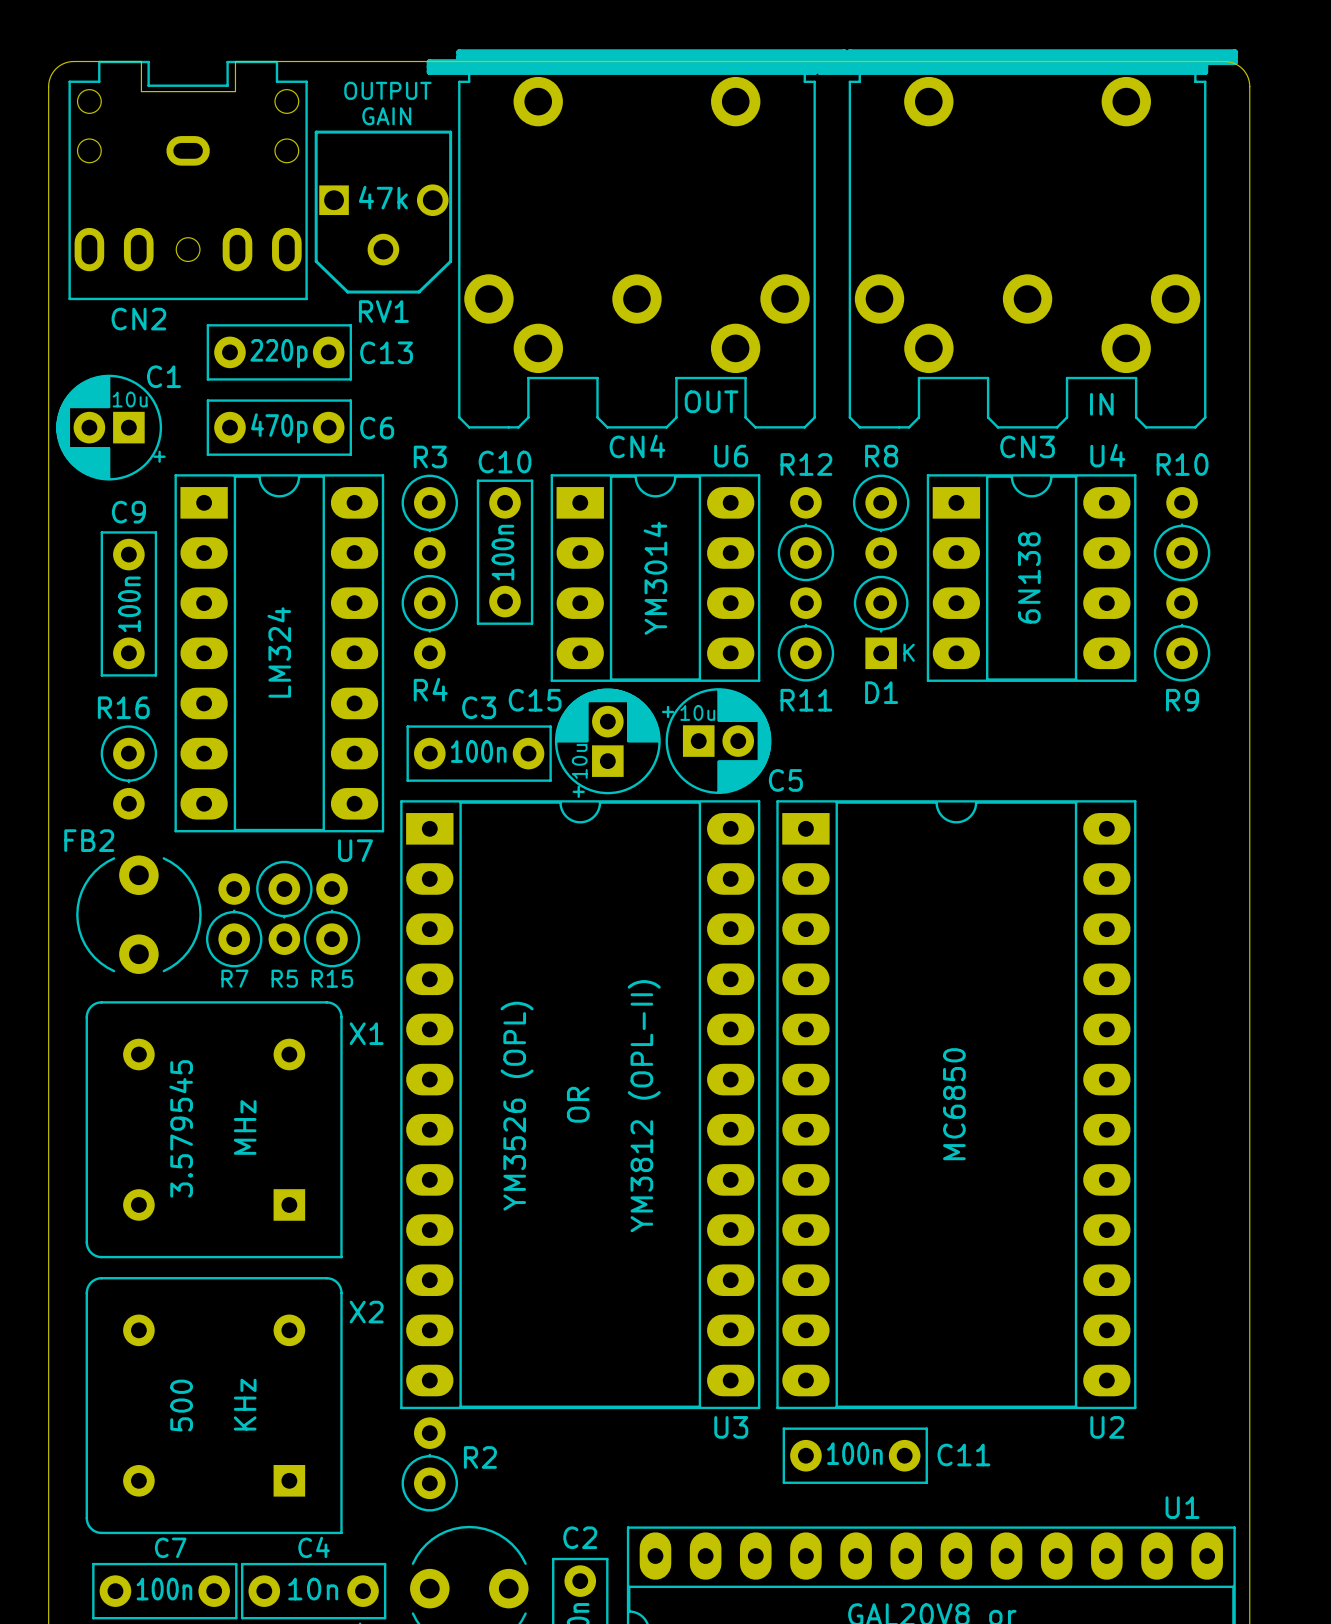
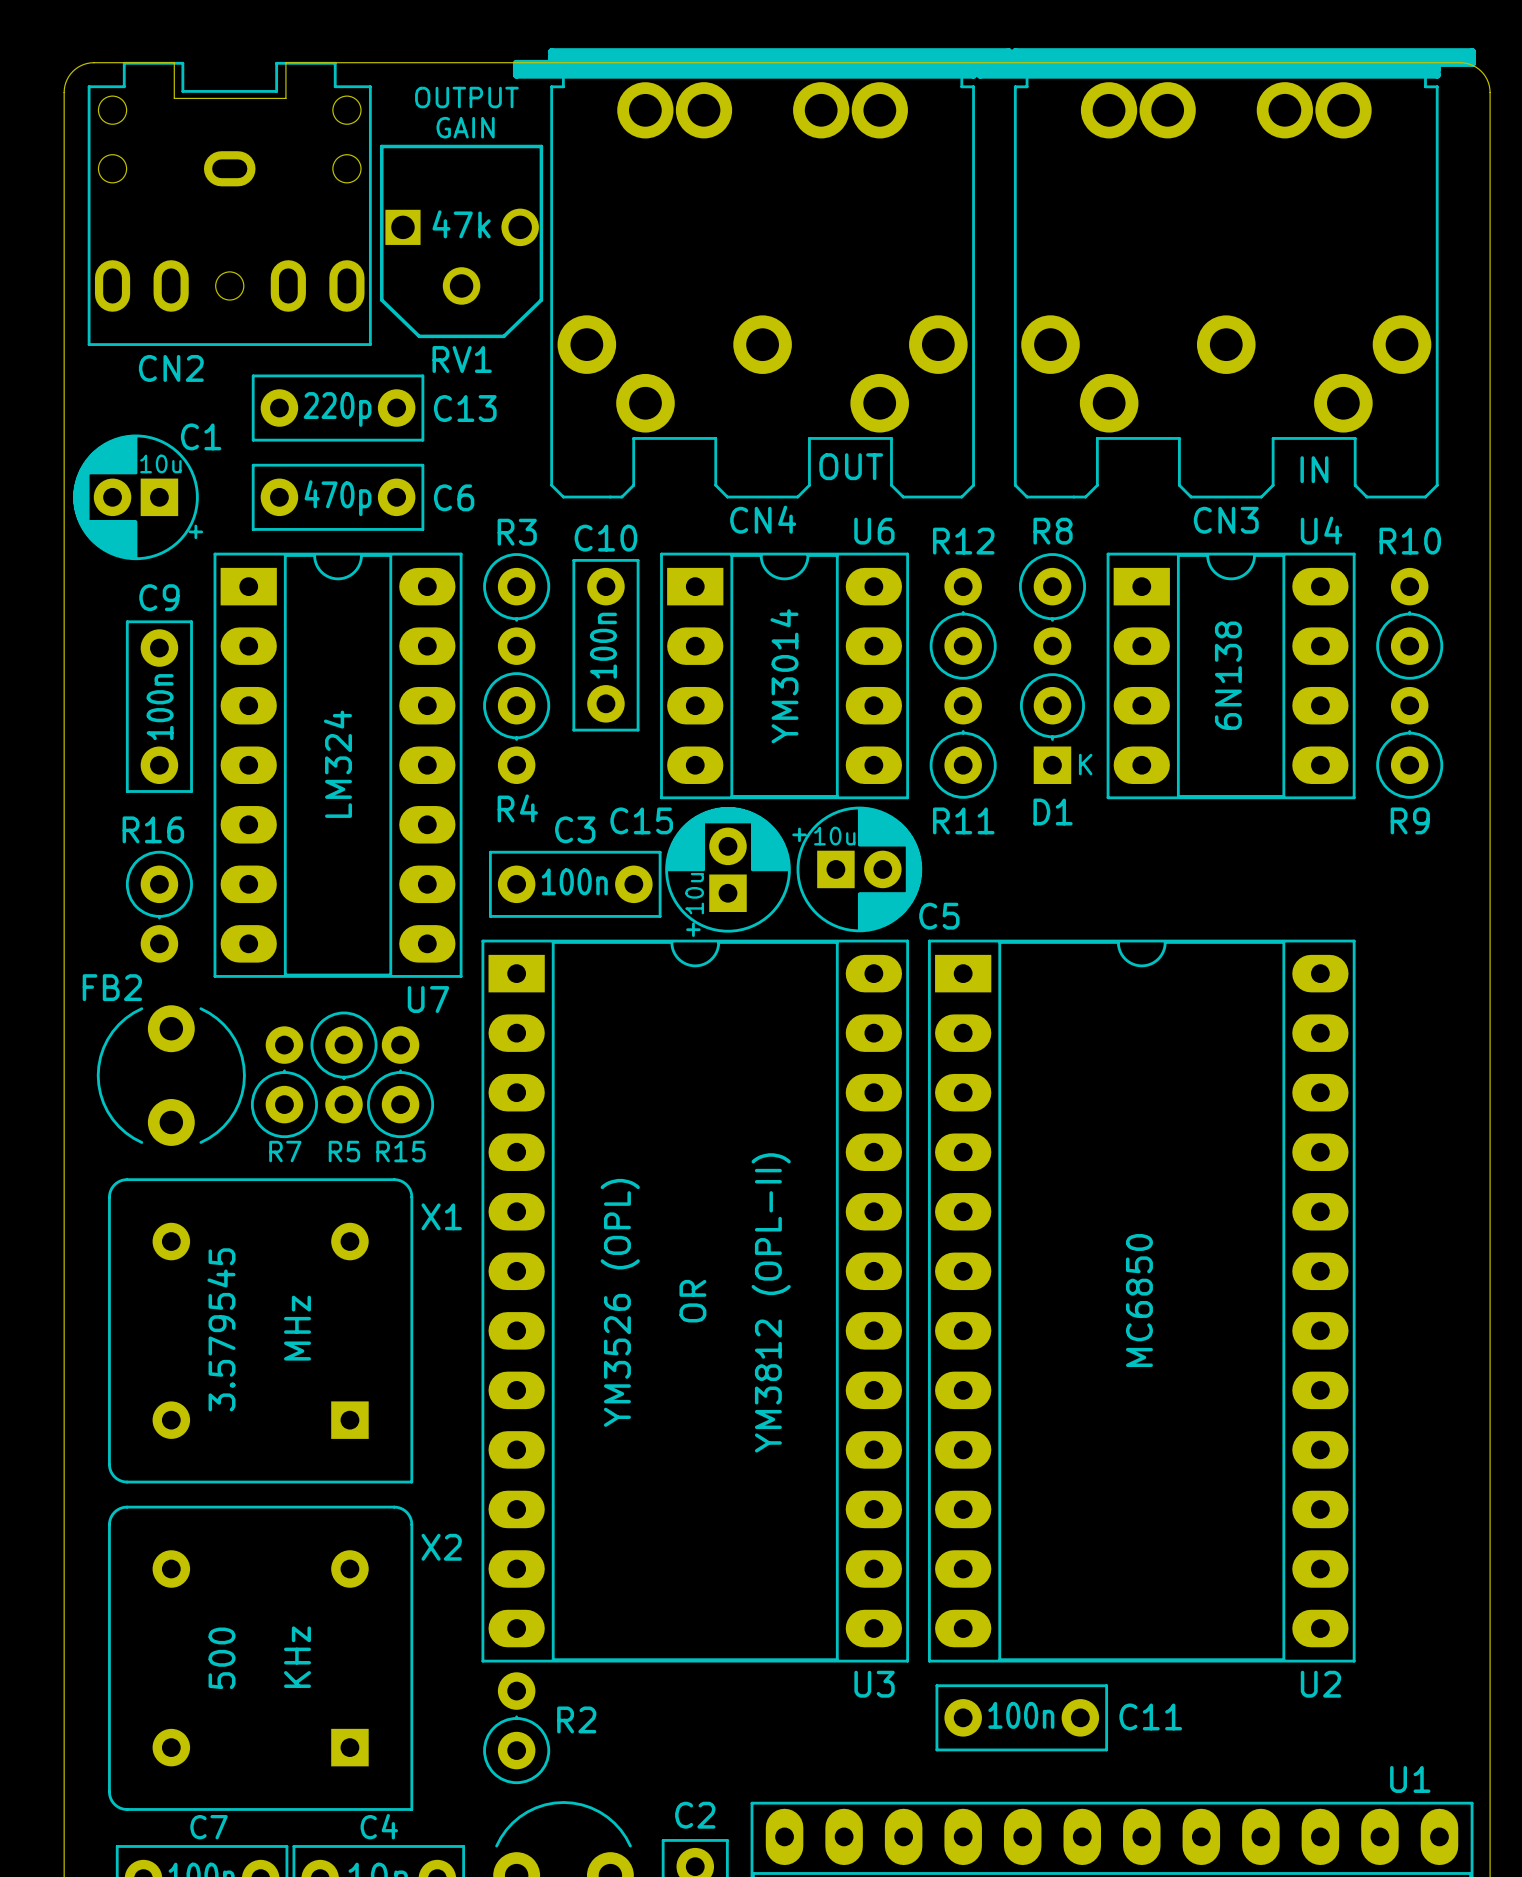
CN4 footprint: [426, 49, 848, 429] -> [512, 48, 1013, 499]
CN3 footprint: [817, 49, 1238, 429] -> [976, 48, 1476, 499]

